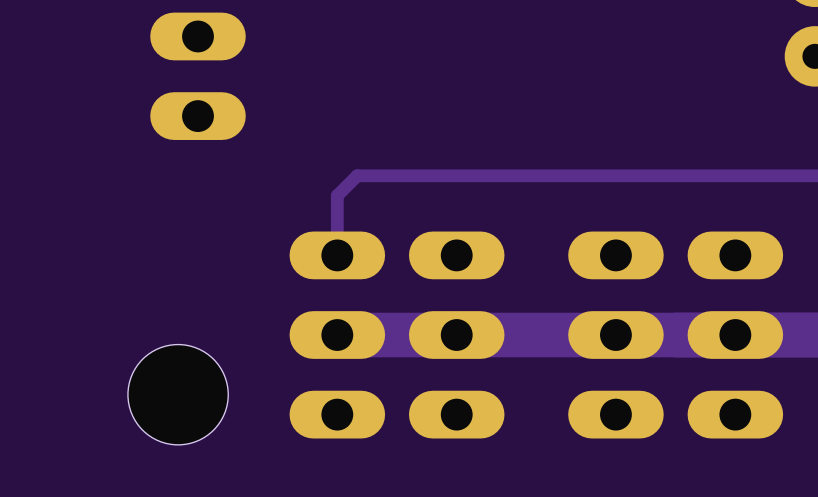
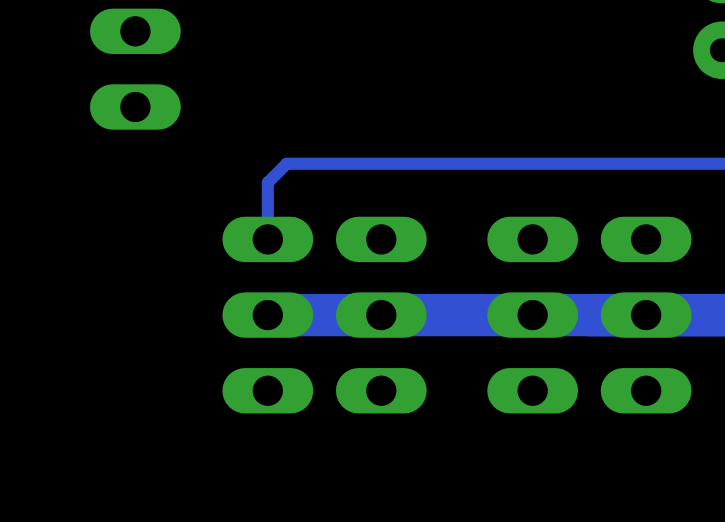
hole: (178, 394) -> none

